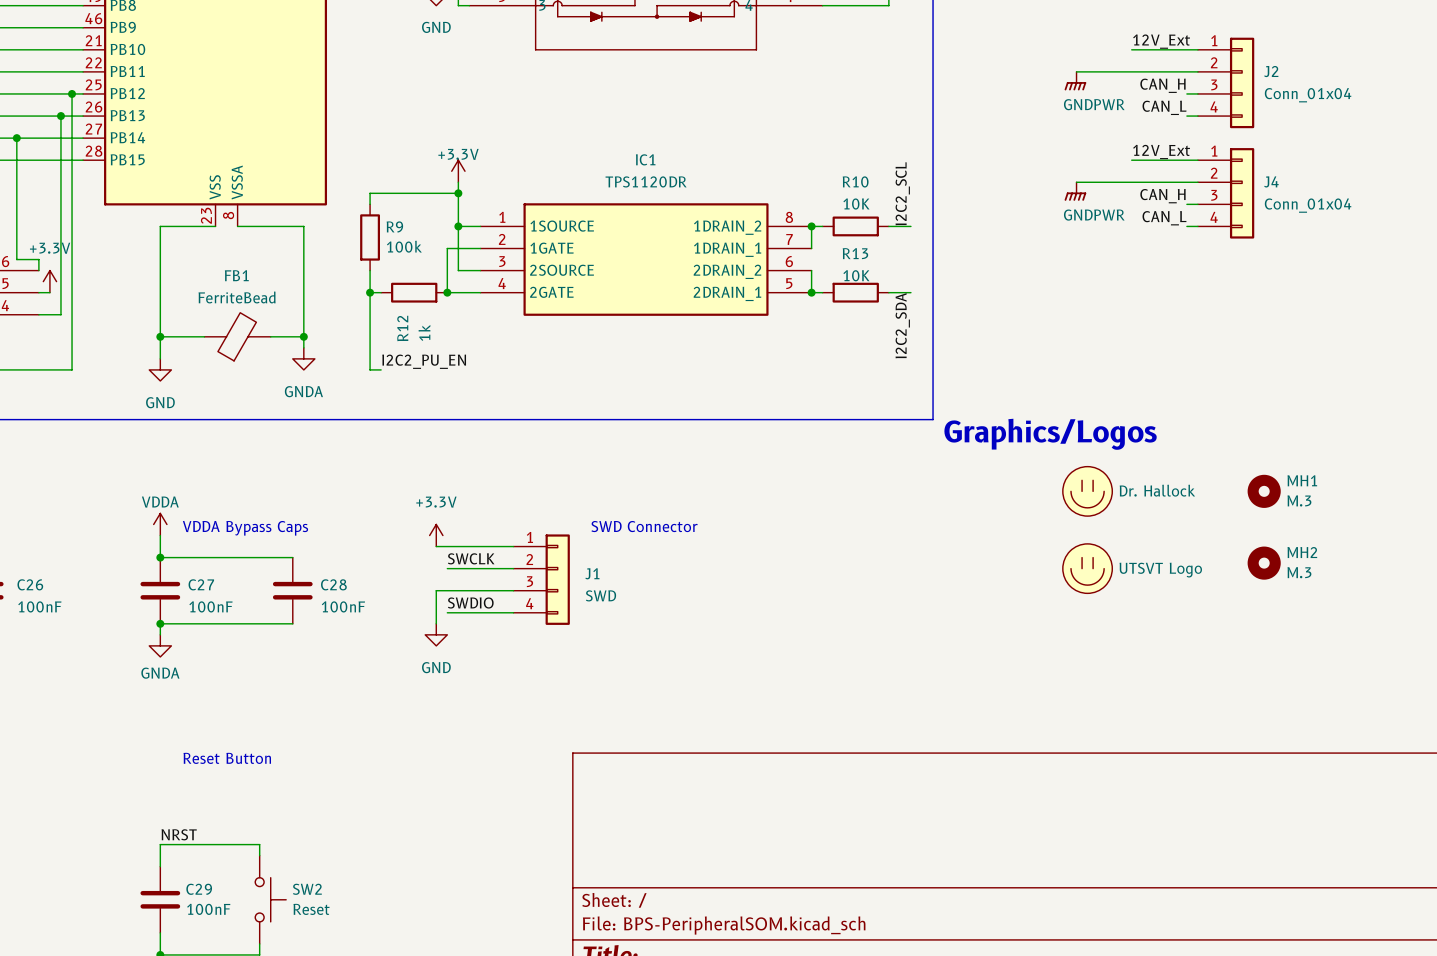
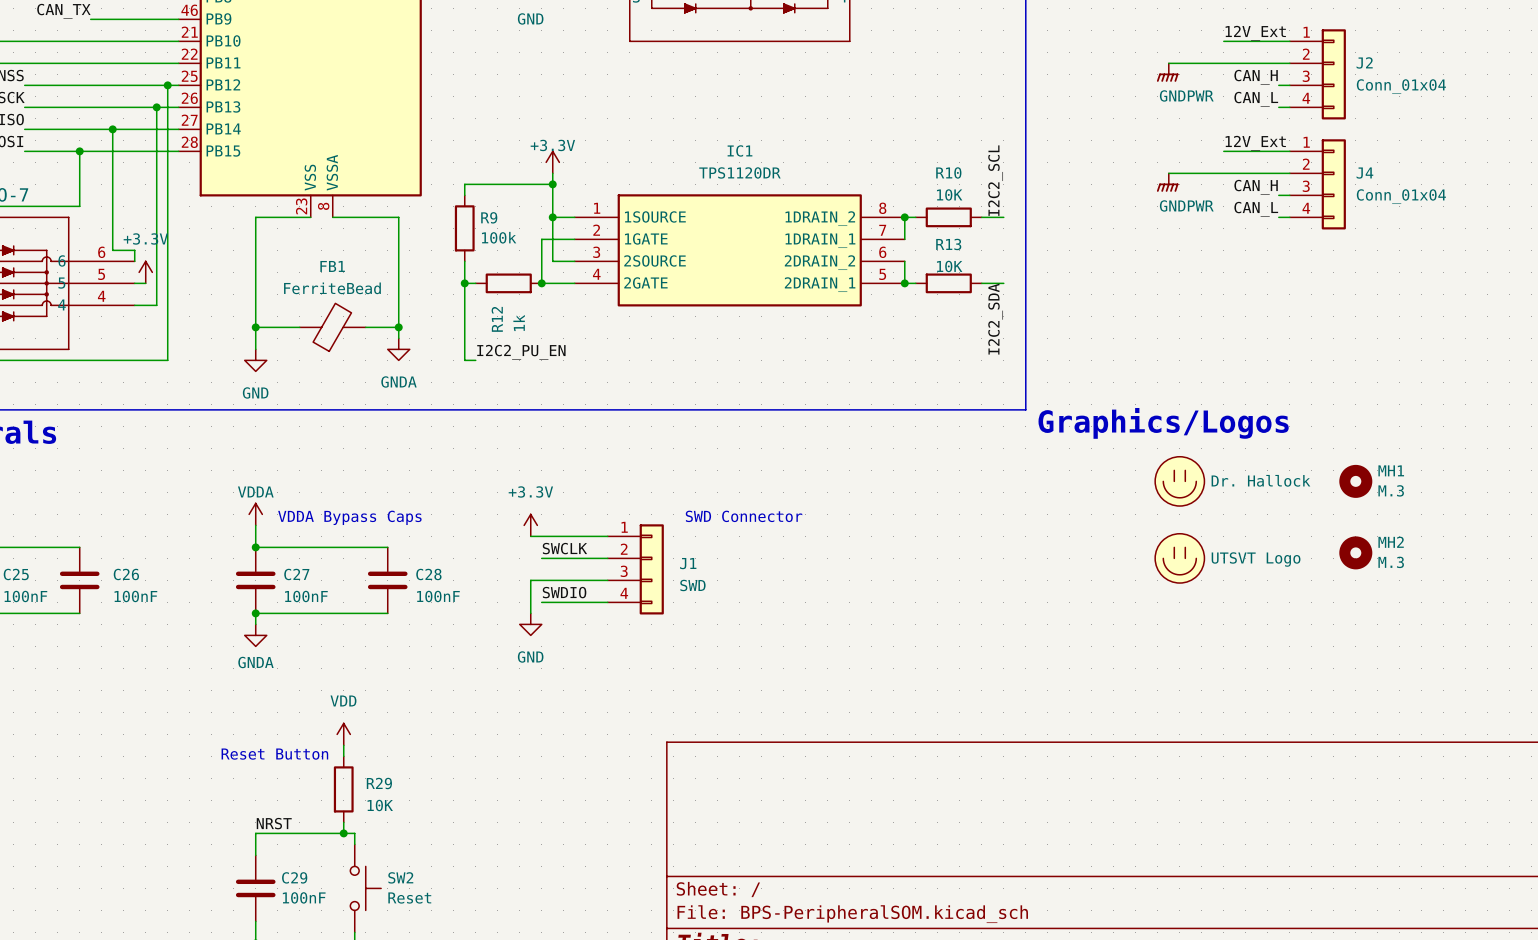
power symbol: none -> VDD (343, 734)
text position: Reset Button (227, 758) -> Reset Button (274, 754)
R29: none -> 10K (343, 789)
wire: none -> (343, 822) (343, 833)
junction: none -> (343, 833)

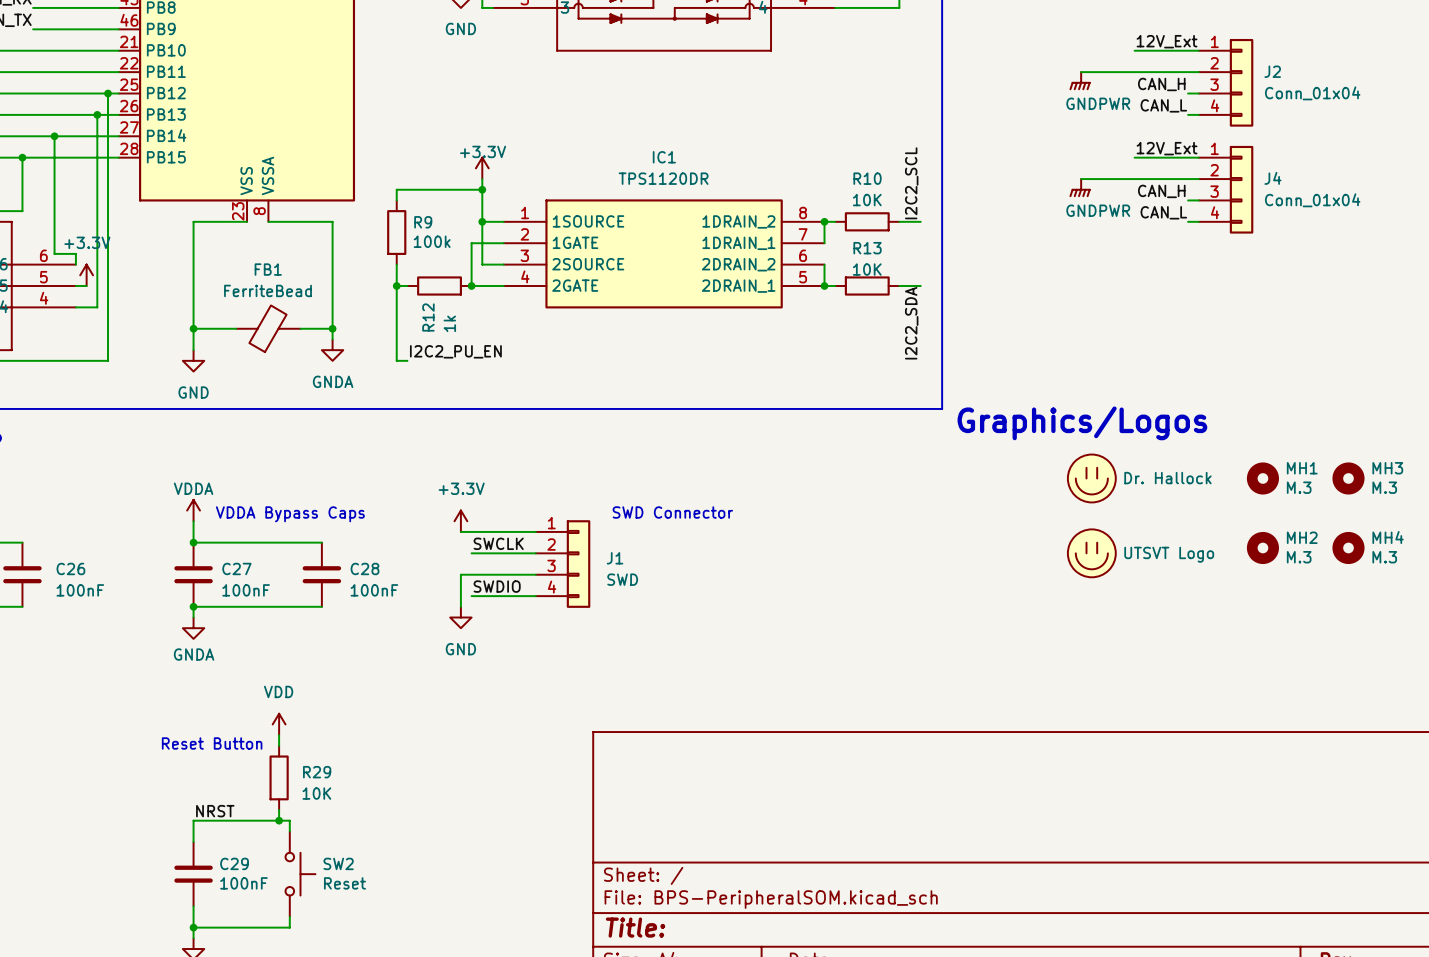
MH3: none -> M.3 (1348, 478)
MH4: none -> M.3 (1348, 547)

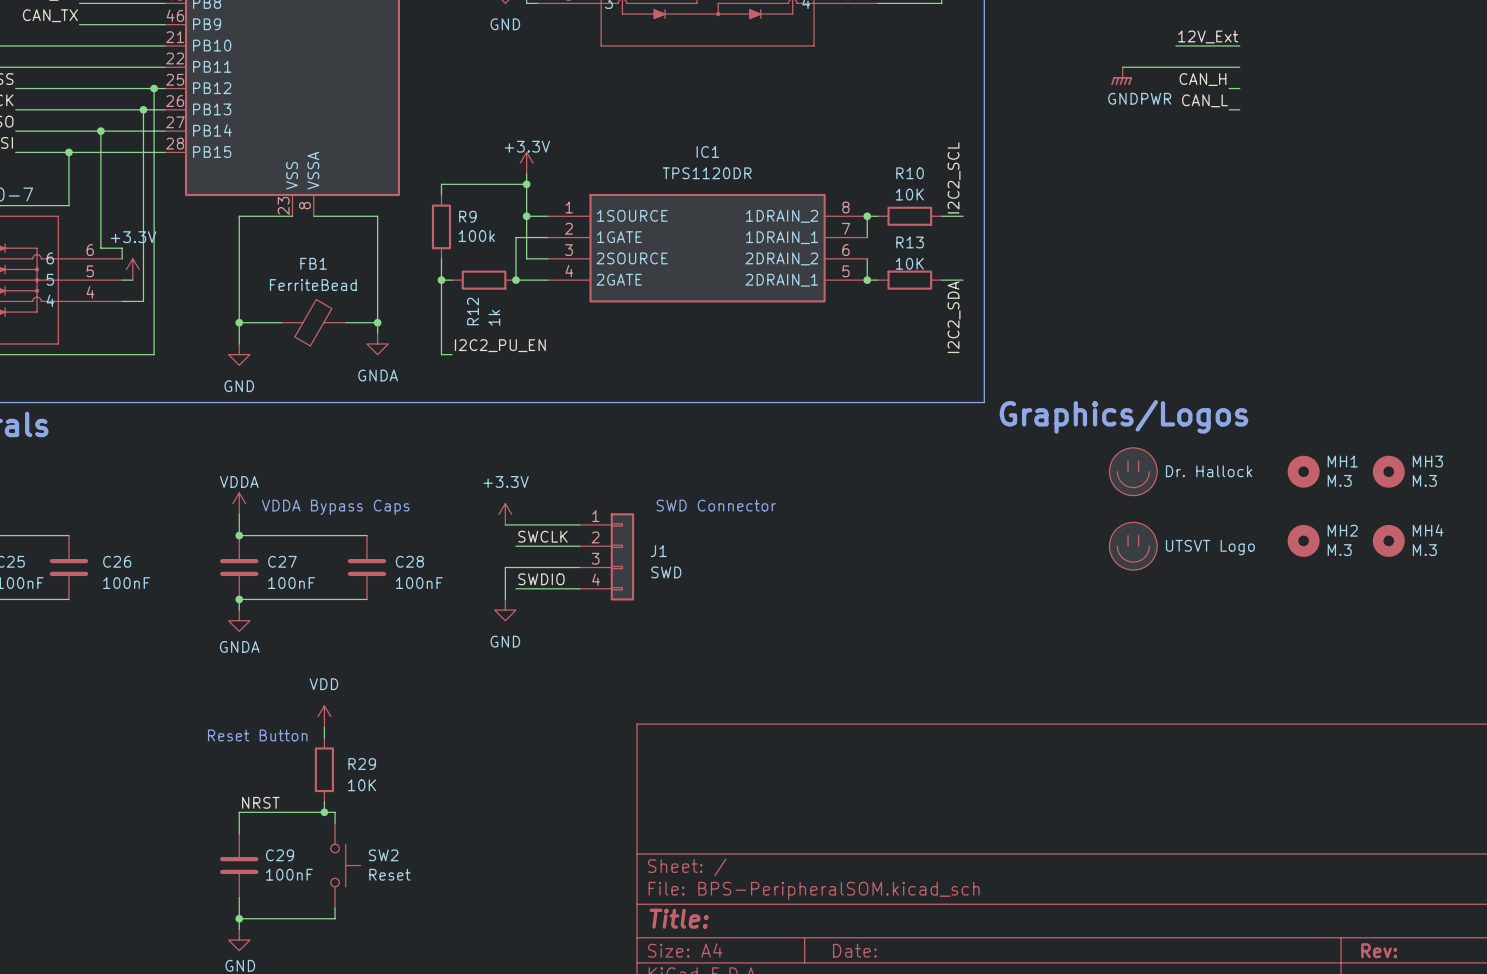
J2: Conn_01x04 (1226, 82) -> none
label: 12V_Ext (1167, 148) -> none
wire: (1134, 157) (1198, 157) -> none
wire: (1081, 179) (1198, 179) -> none
power symbol: GNDPWR (1080, 188) -> none
J4: Conn_01x04 (1226, 189) -> none
label: CAN_H (1161, 191) -> none
wire: (1188, 200) (1198, 200) -> none
label: CAN_L (1163, 212) -> none
wire: (1188, 221) (1198, 221) -> none

